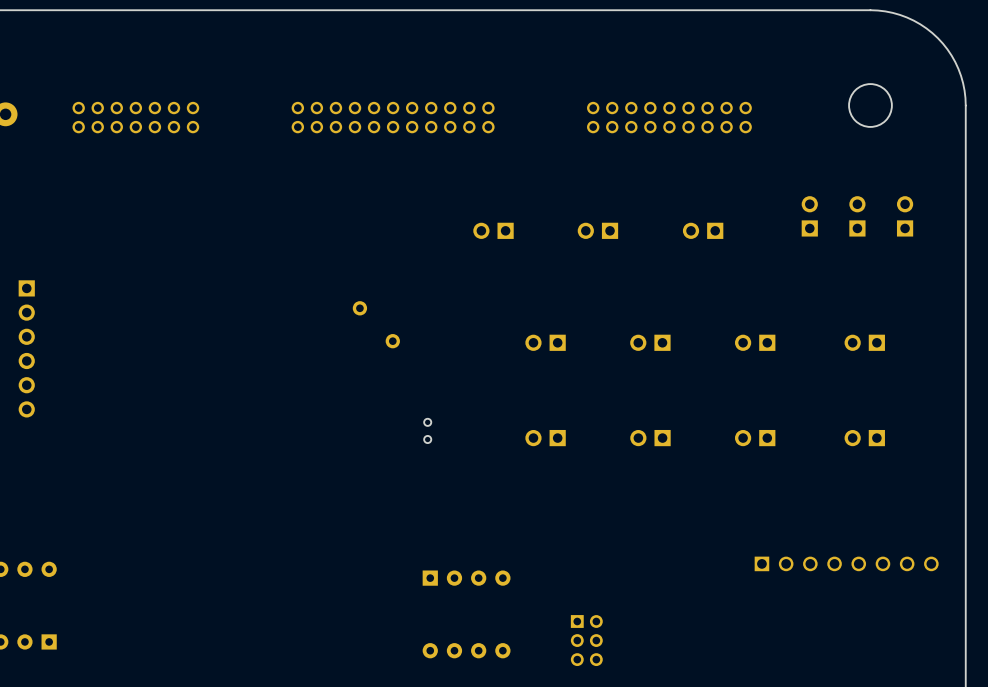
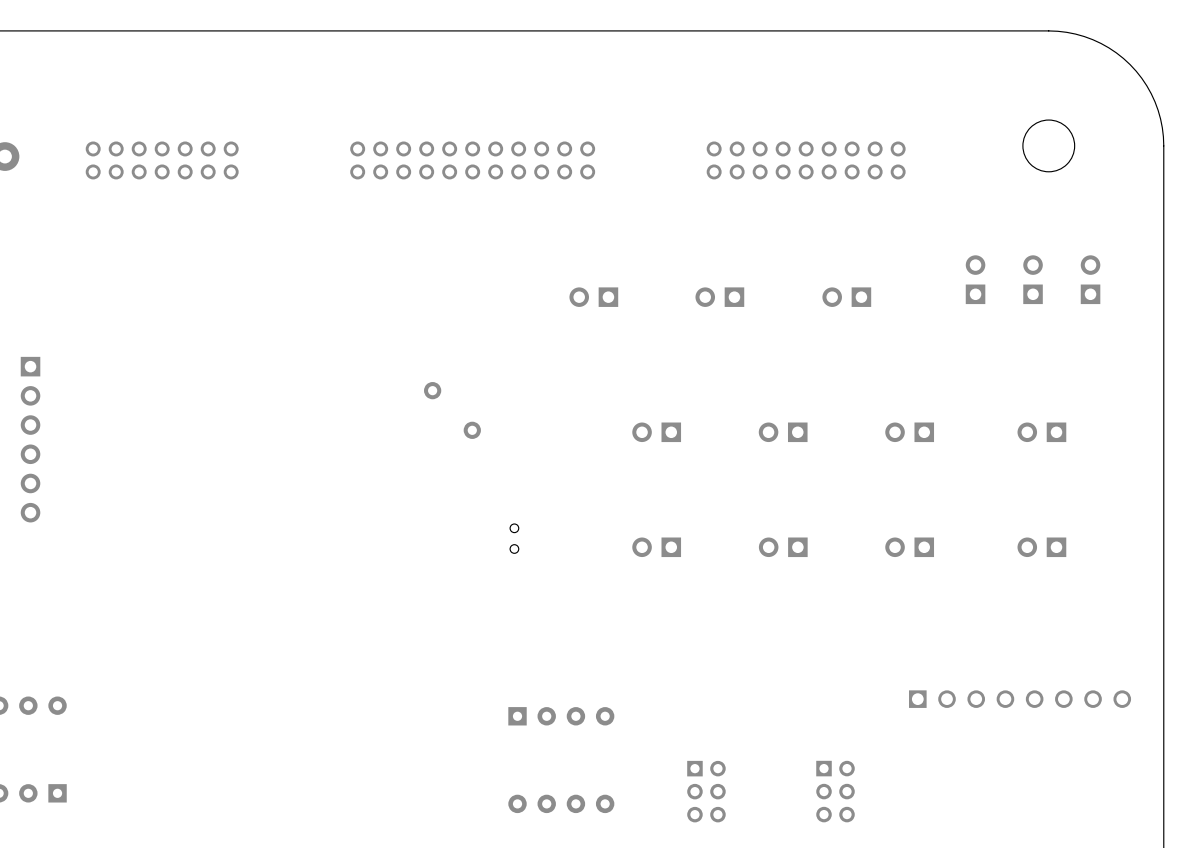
part: none -> (835, 791)

